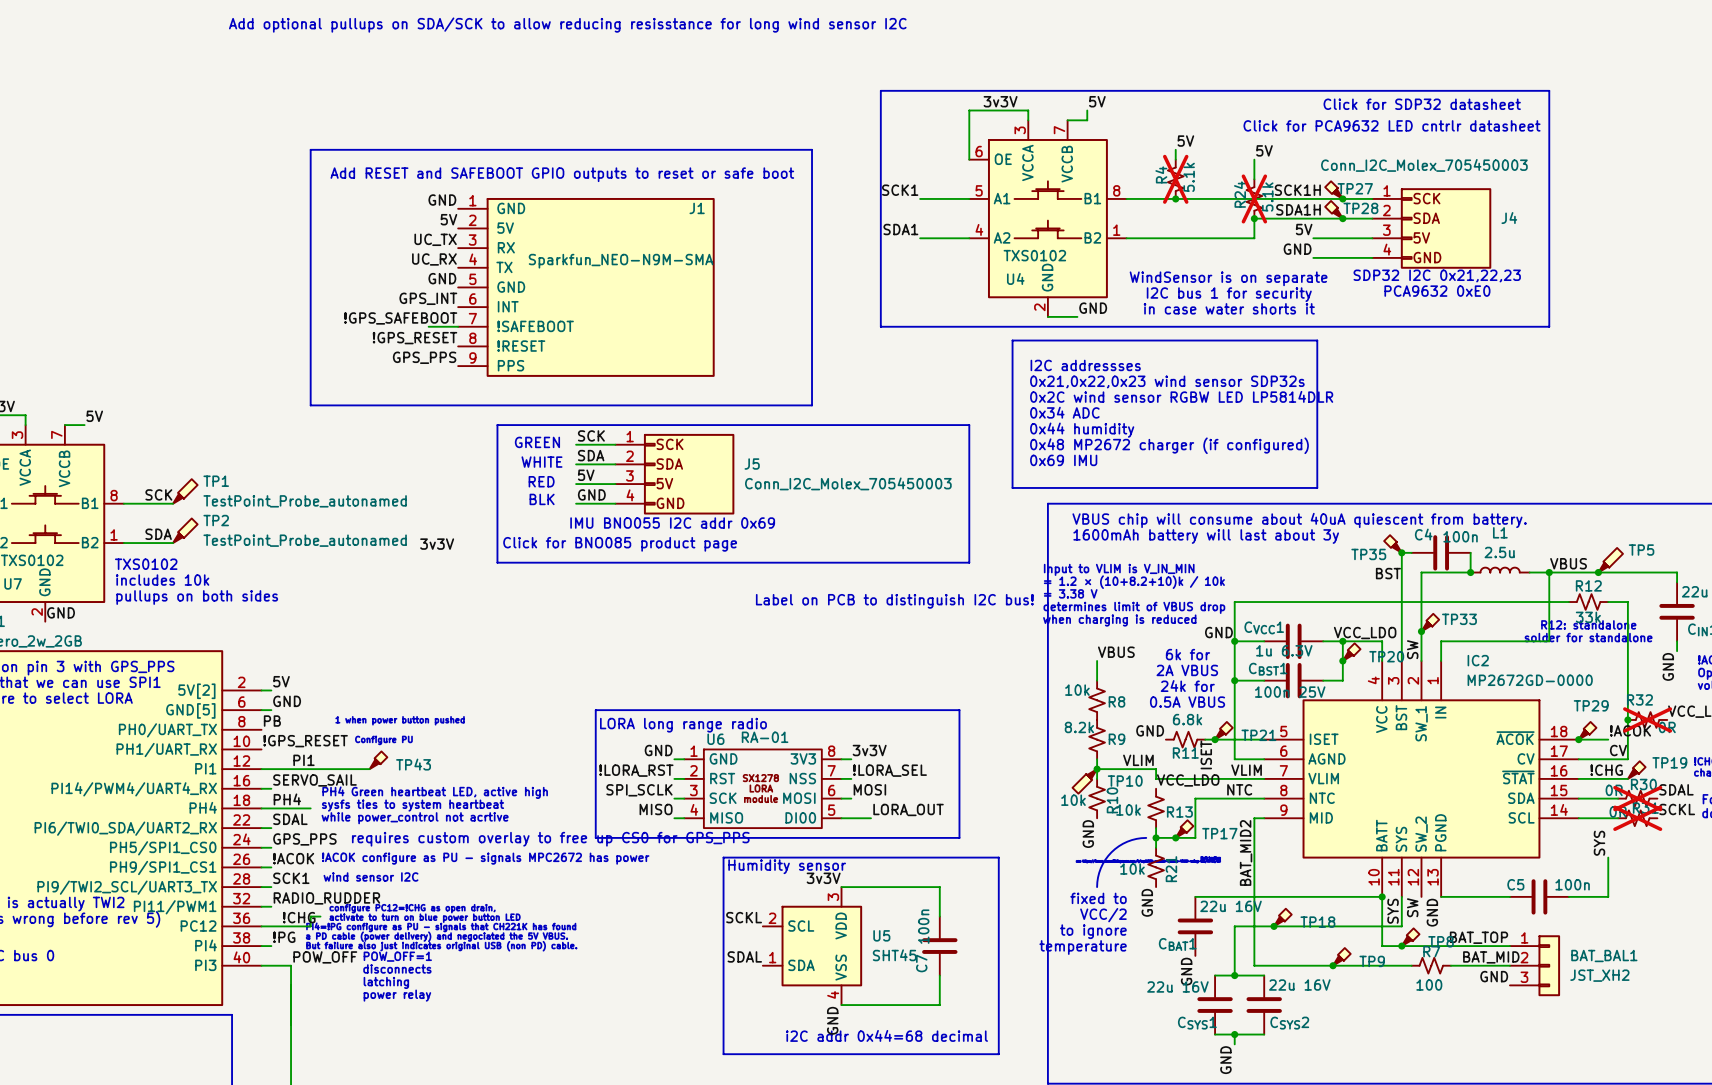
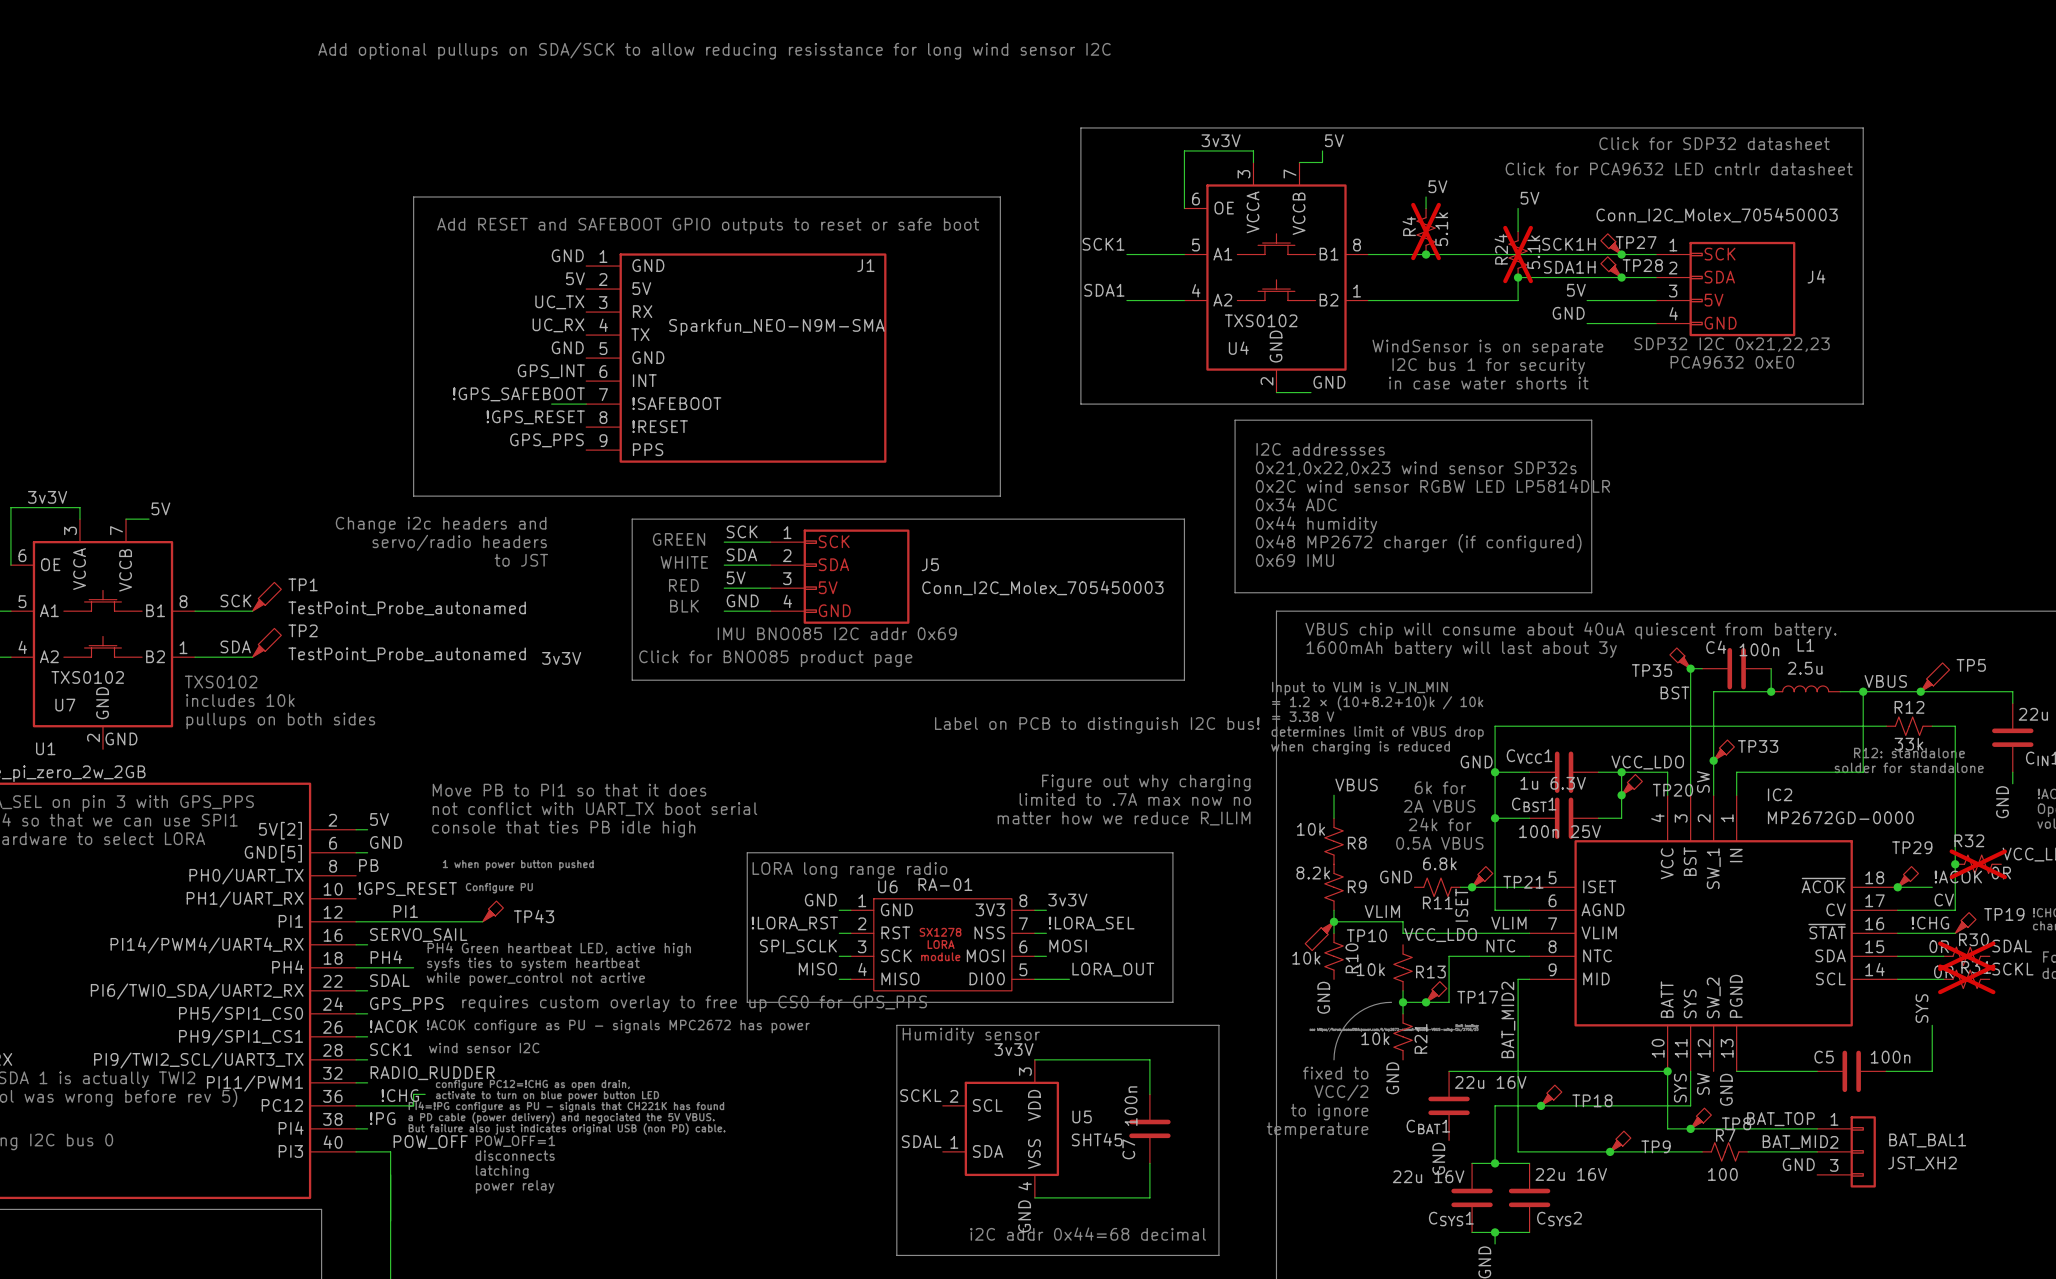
text: none -> Change i2c headers and (441, 525)
text: none -> servo/radio headers (459, 542)
text: none -> to JST (521, 560)
text: IMU BNO055 I2C addr 0x69 (672, 523) -> IMU BNO085 I2C addr 0x69 (837, 633)
text: none -> Figure out why charging (1146, 782)
text: none -> Move PB to PI1 so that it does (569, 790)
text: none -> limited to .7A max now no (1135, 799)
text: none -> not conflict with UART_TX boot serial (594, 809)
text: none -> matter how we reduce R_ILIM (1124, 818)
text: none -> console that ties PB idle high (563, 829)

